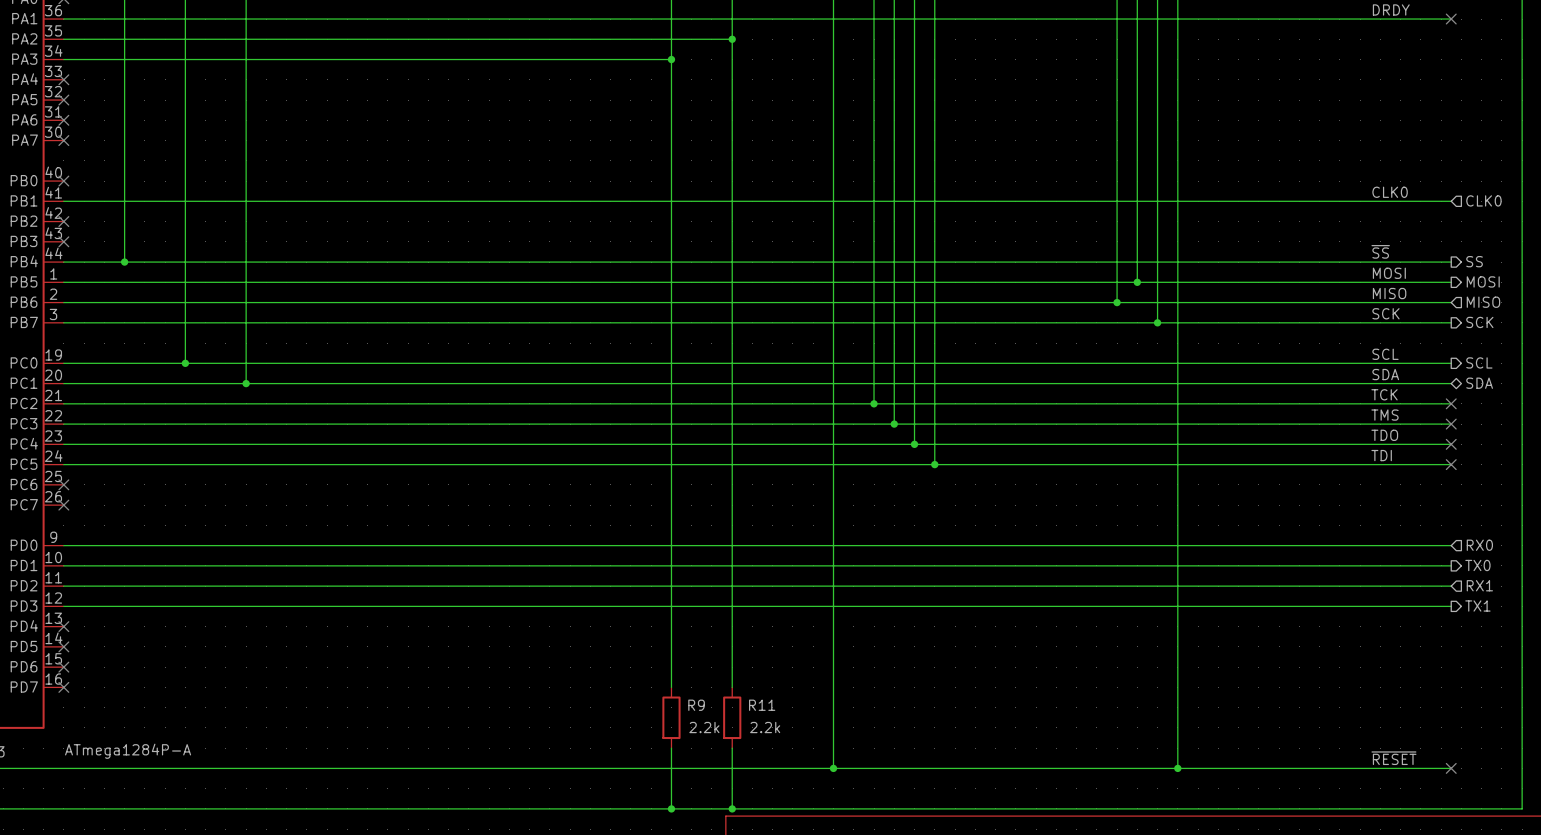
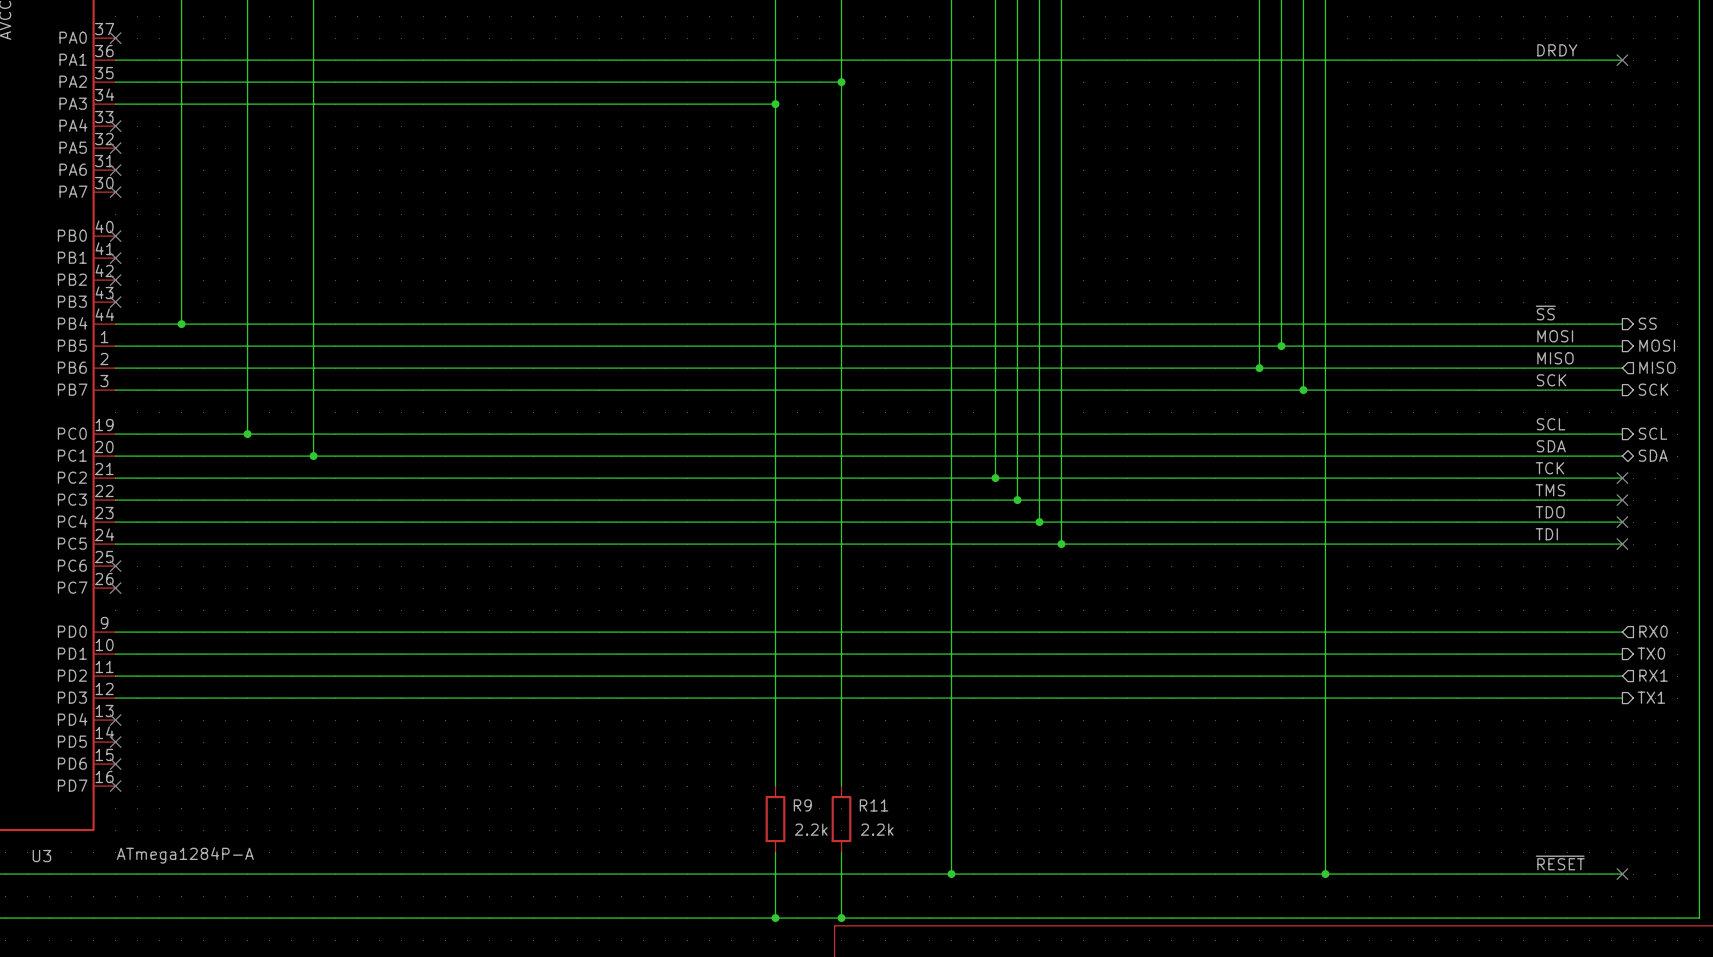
label: CLK0 (1390, 192) -> none
hierarchical label: CLK0 (1483, 200) -> none
wire: (63, 201) (1451, 201) -> none
no-connect mark: none -> (115, 258)

